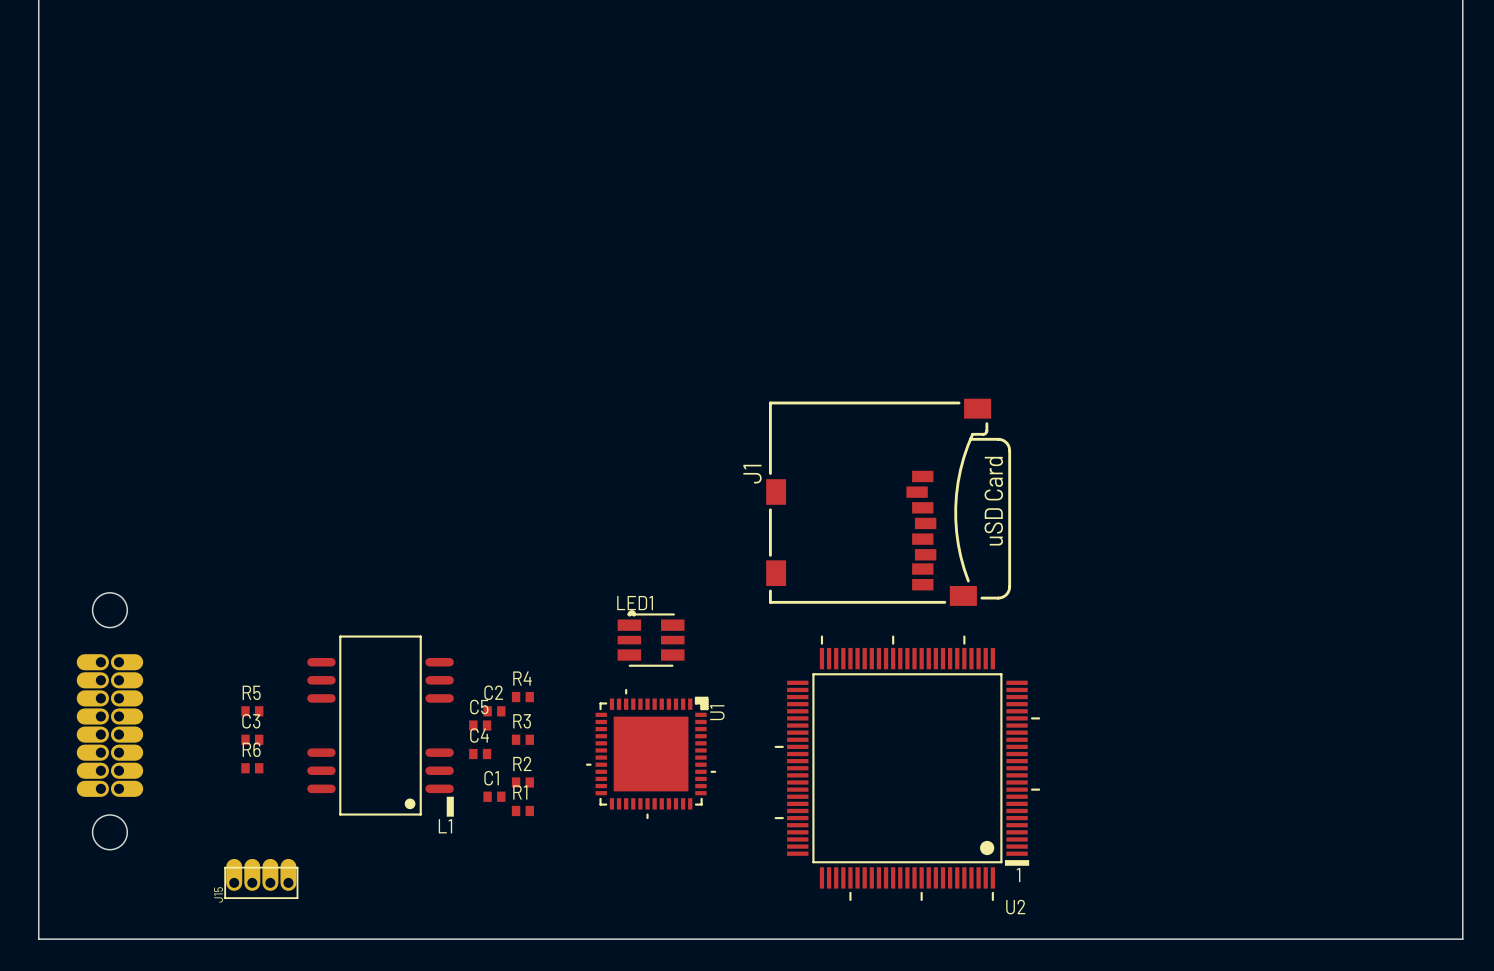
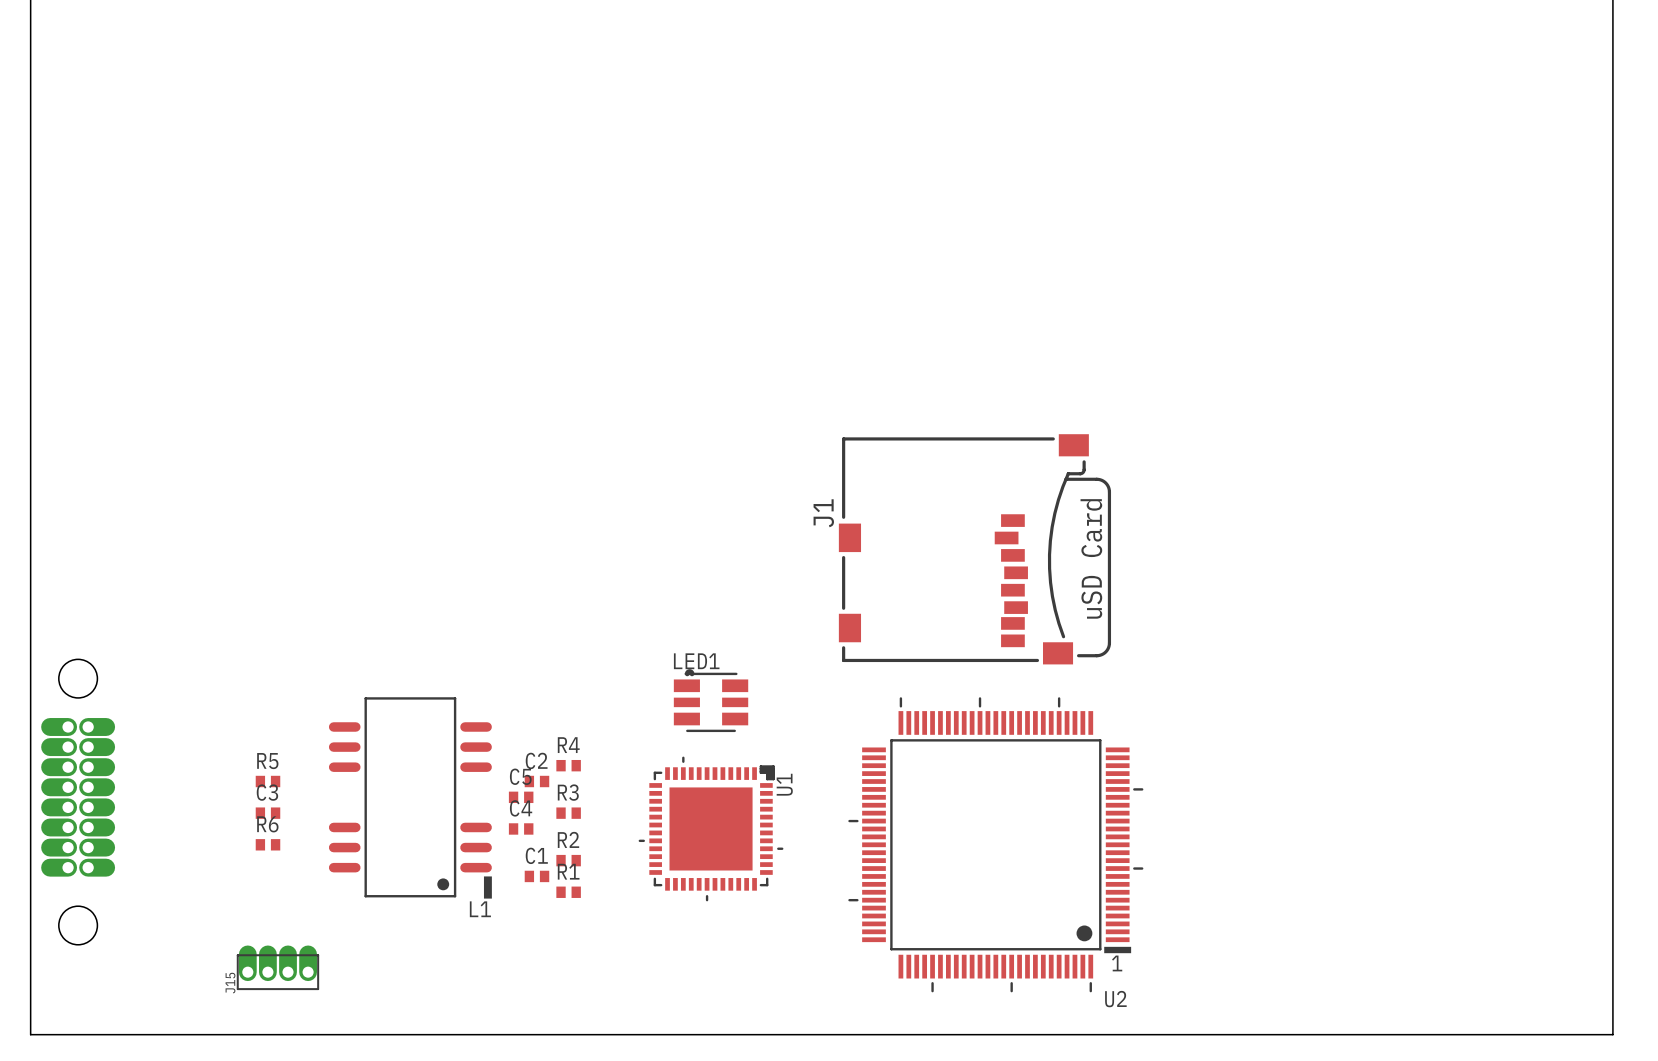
part rotation: 0° (109, 721) -> 180° (78, 802)

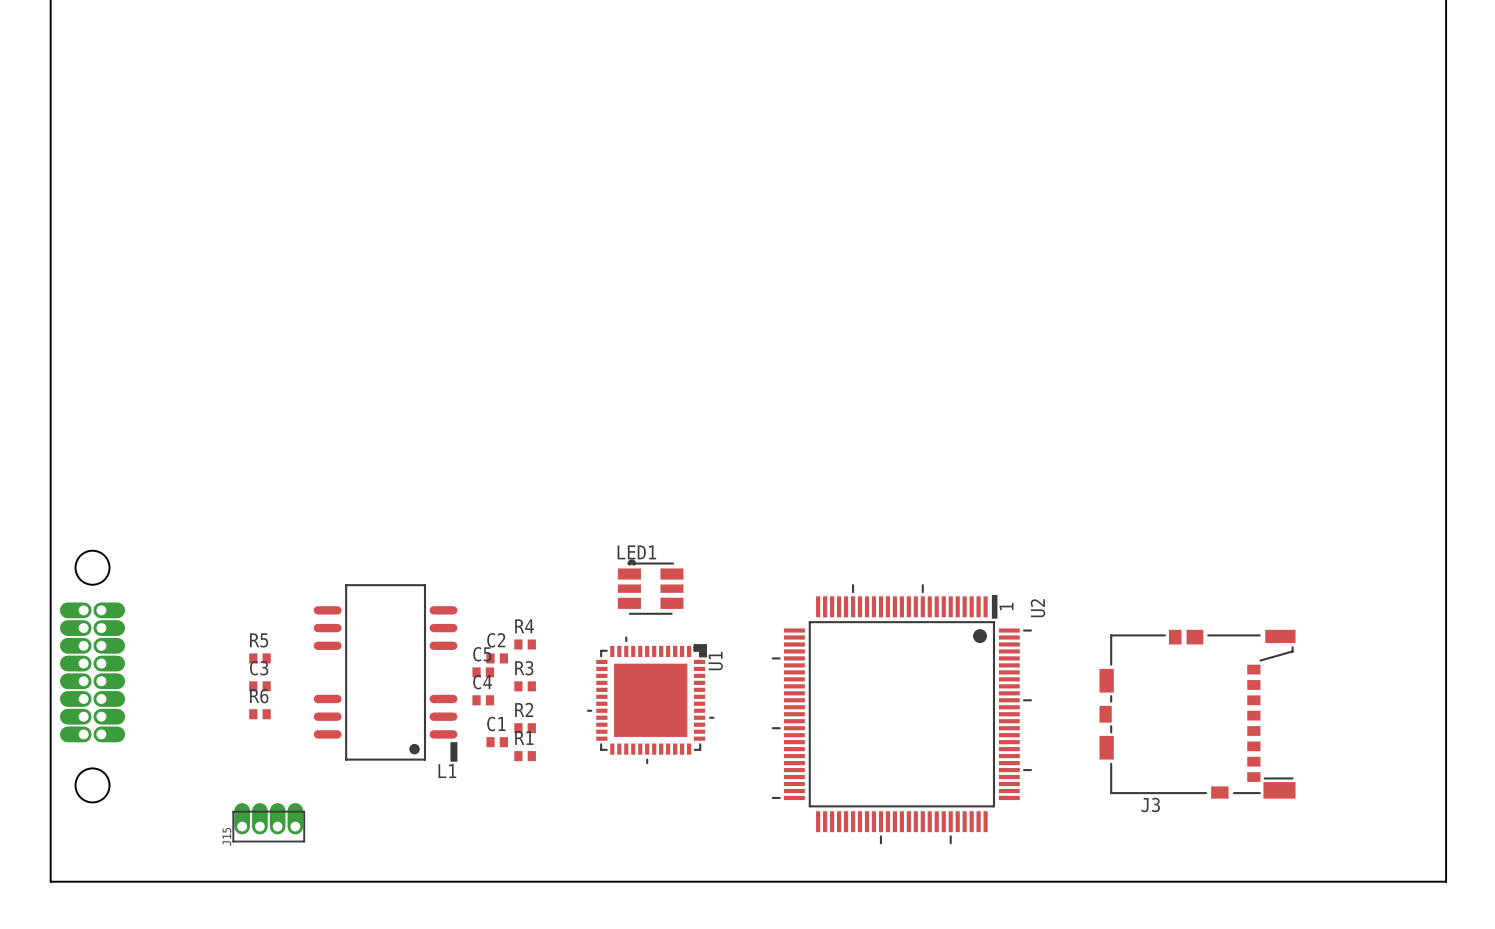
J1: (974, 549) -> none
U2 rotation: 0° (995, 844) -> 90° counterclockwise (901, 714)
J3: none -> (1197, 714)

